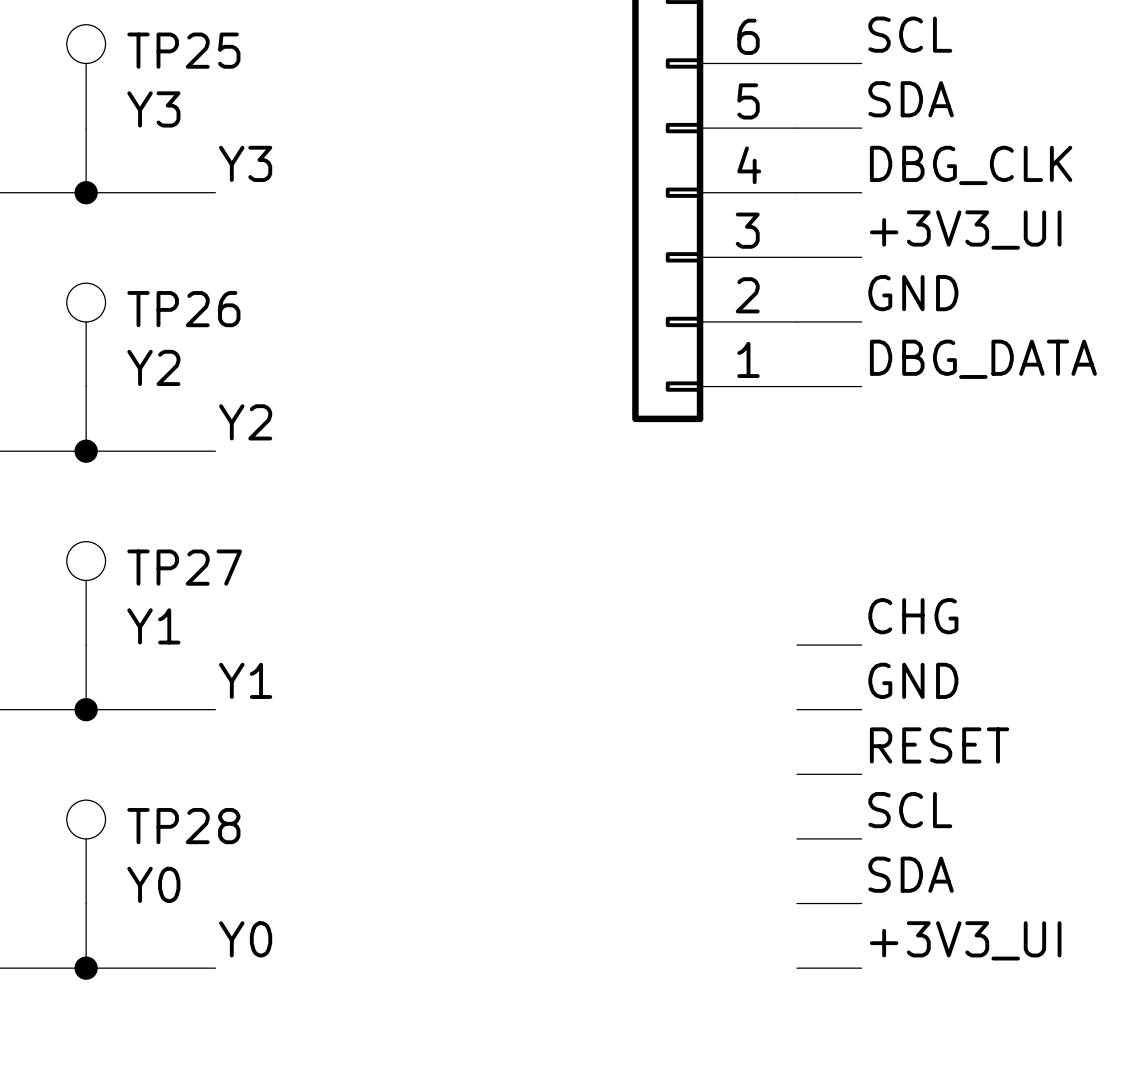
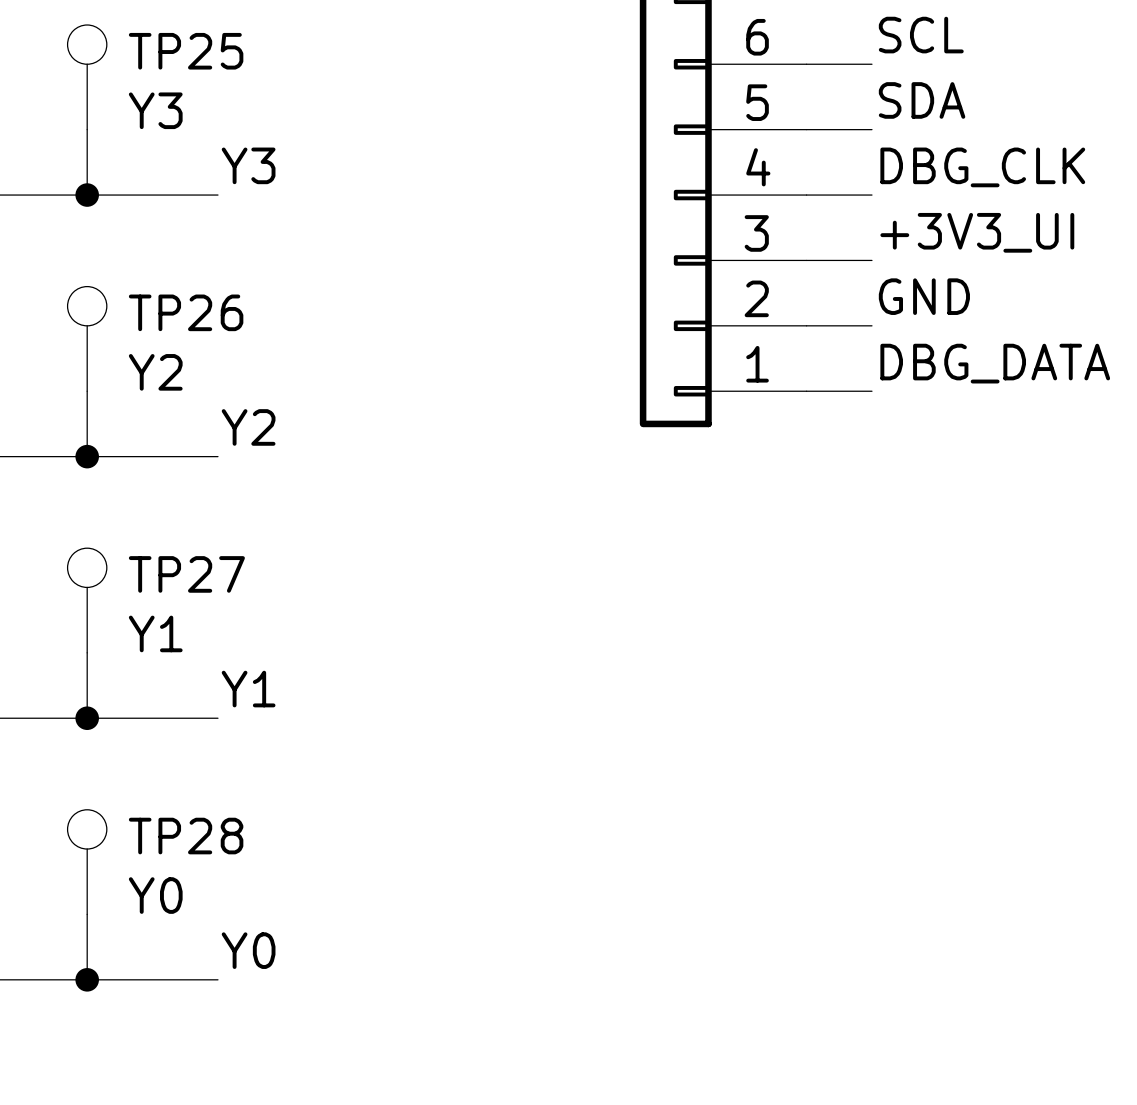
label: CHG (913, 616) -> none
wire: (796, 645) (861, 645) -> none
label: GND (913, 680) -> none
wire: (796, 709) (861, 709) -> none
label: RESET (939, 745) -> none
wire: (796, 774) (861, 774) -> none
label: SCL (910, 810) -> none
wire: (796, 838) (861, 838) -> none
label: SDA (911, 874) -> none
wire: (796, 903) (861, 903) -> none
label: +3V3_UI (965, 940) -> none
wire: (796, 968) (861, 968) -> none

